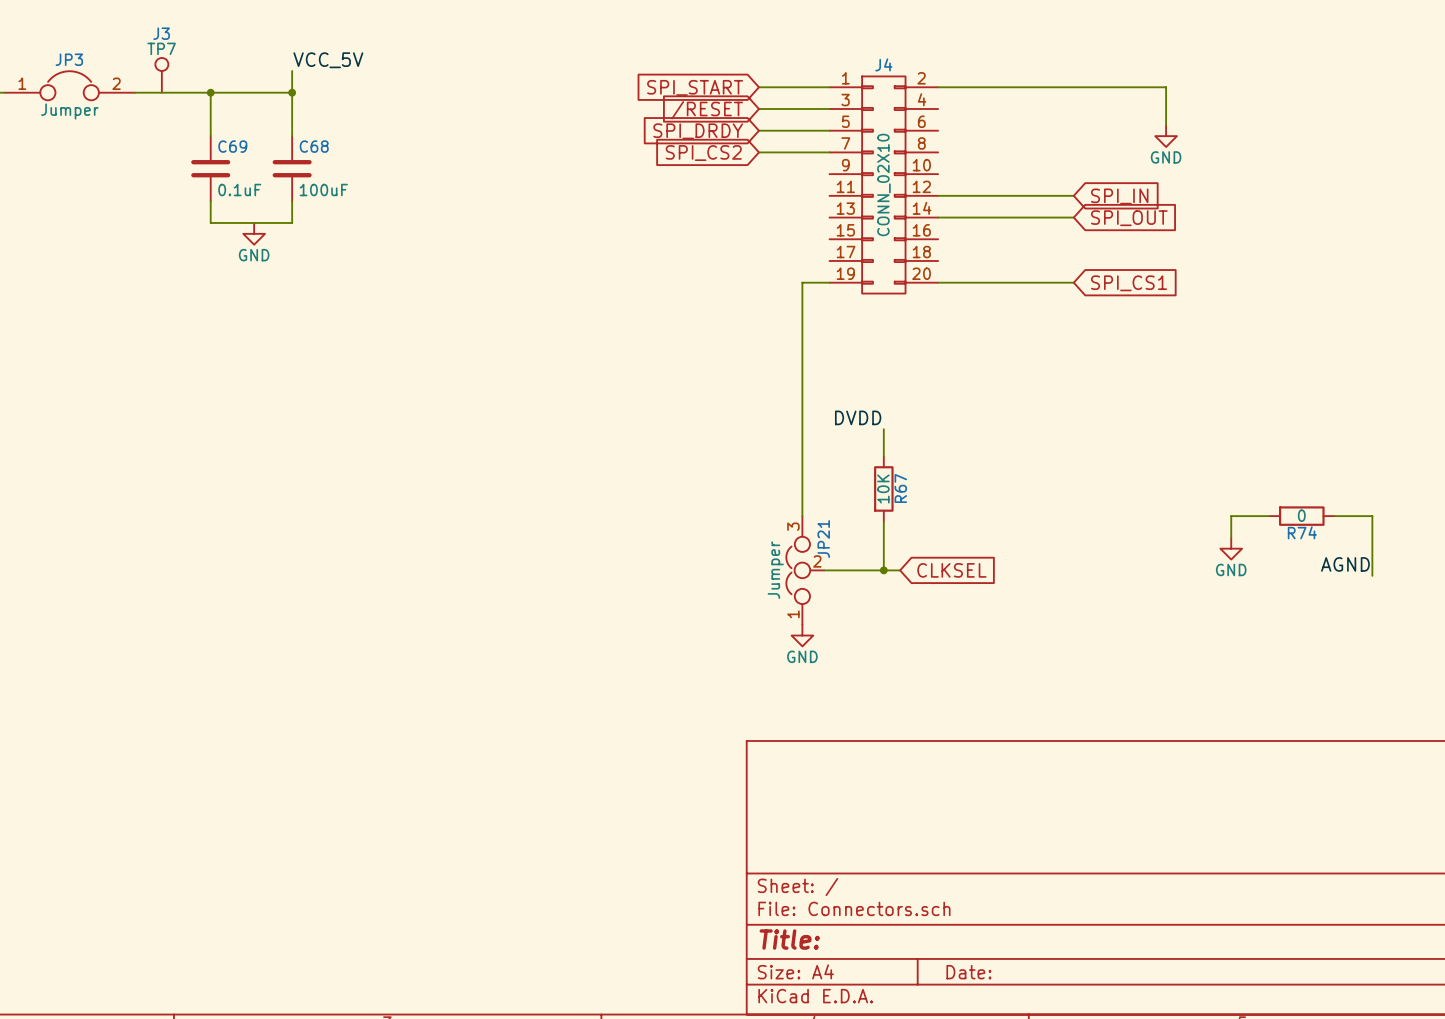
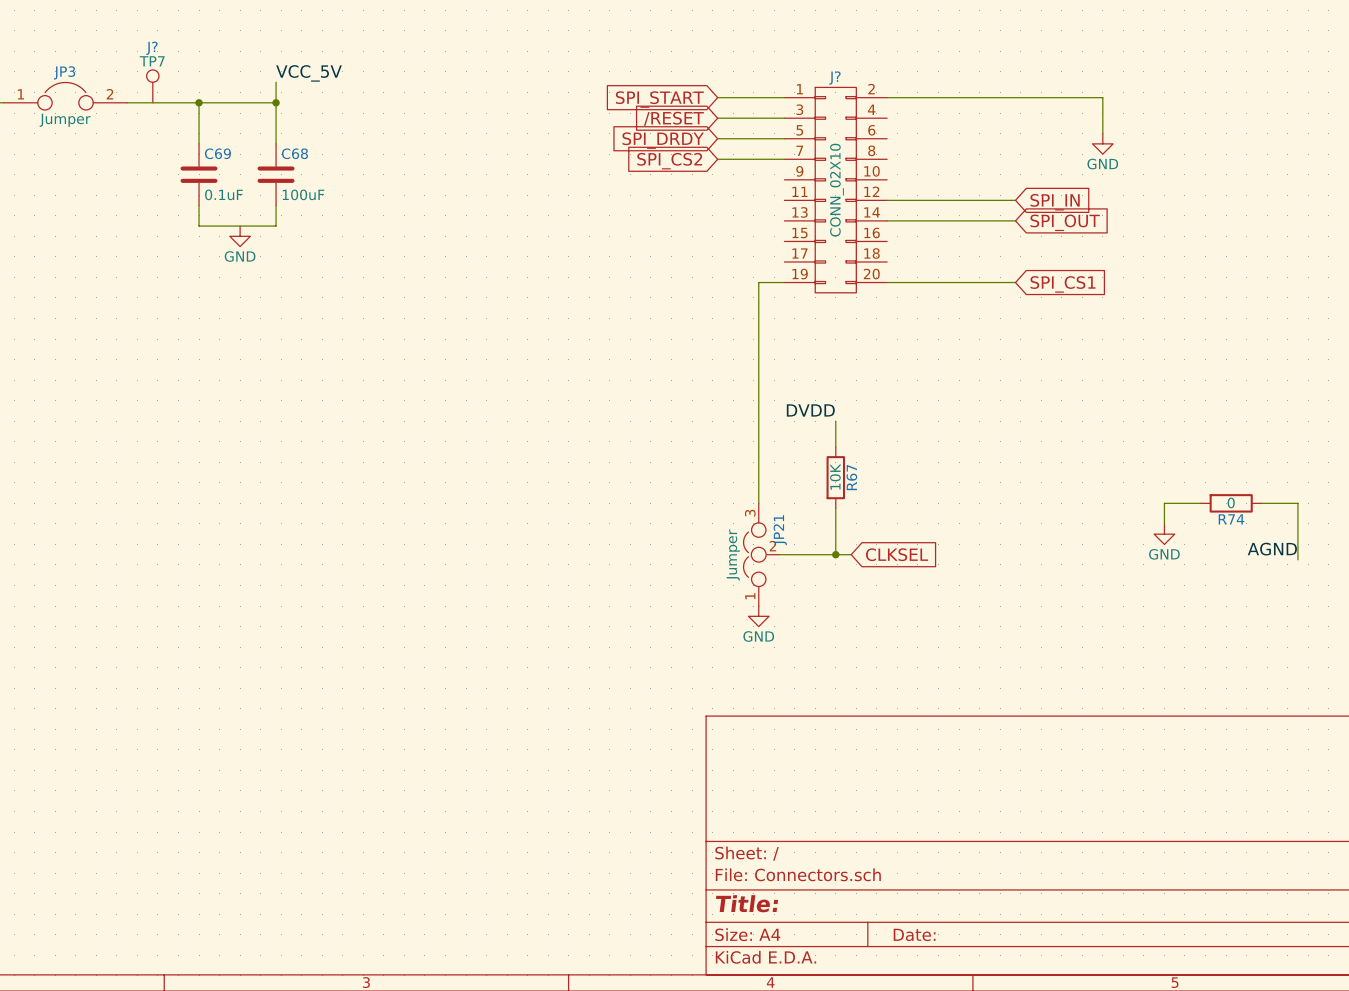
J3 name: J3 (161, 33) -> J? (151, 48)
J4 name: J4 (883, 64) -> J? (834, 78)

